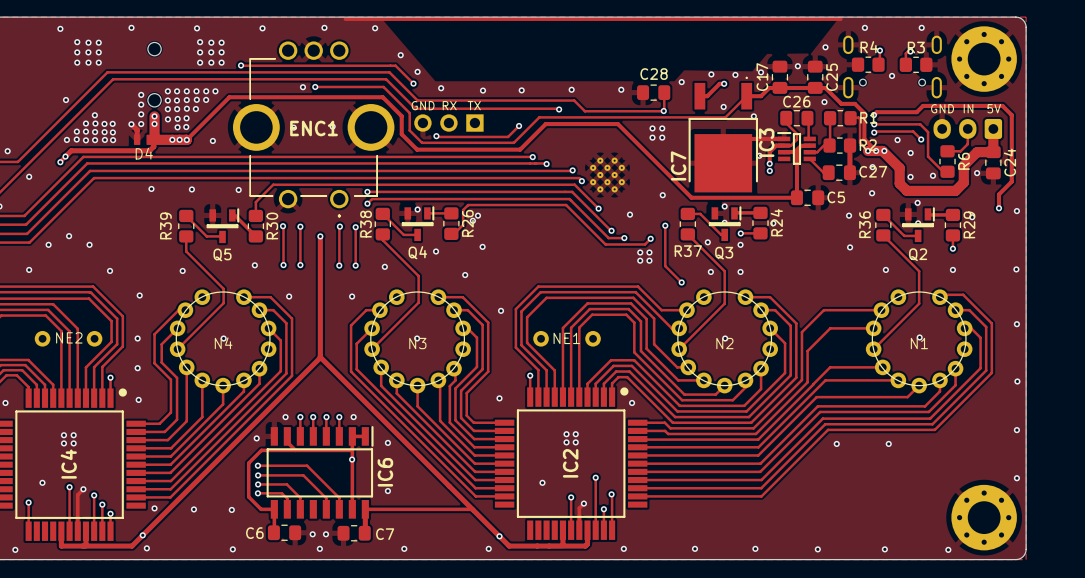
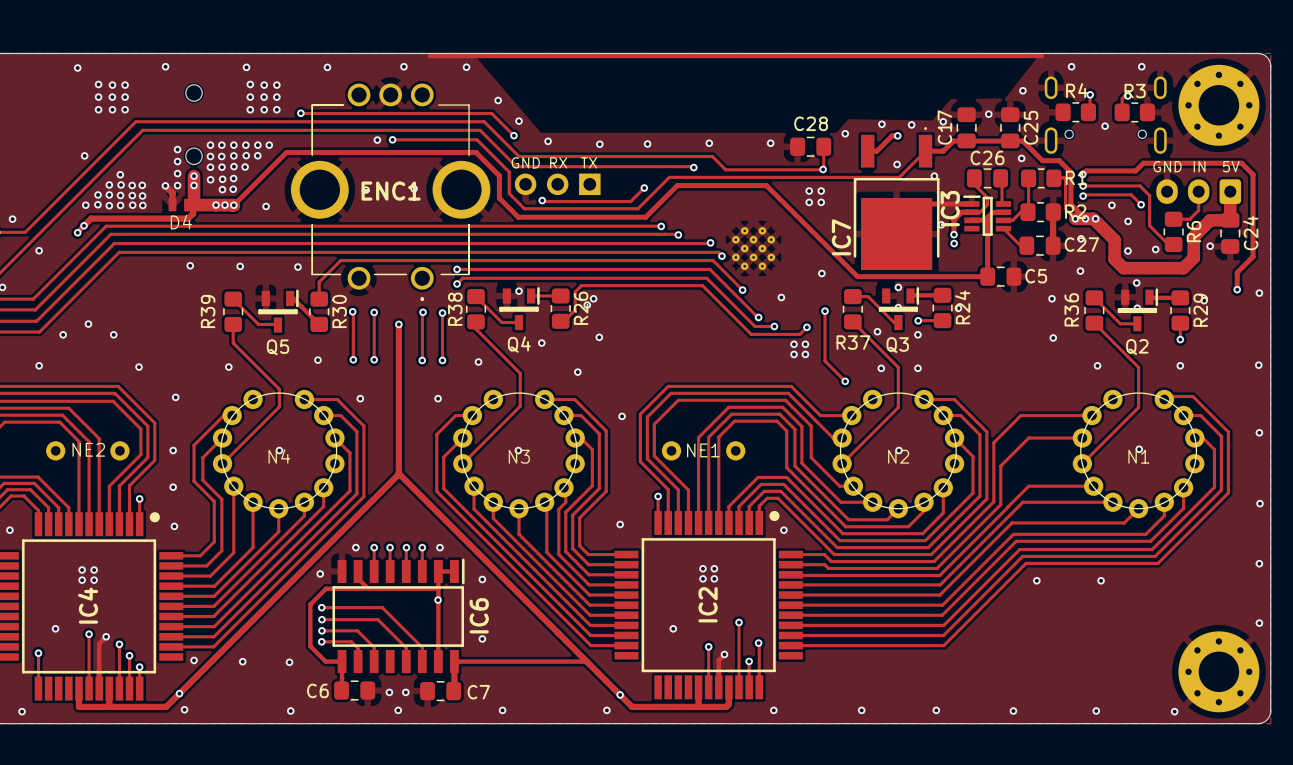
ENC1 footprint: [232, 41, 395, 218] -> [290, 83, 491, 302]

